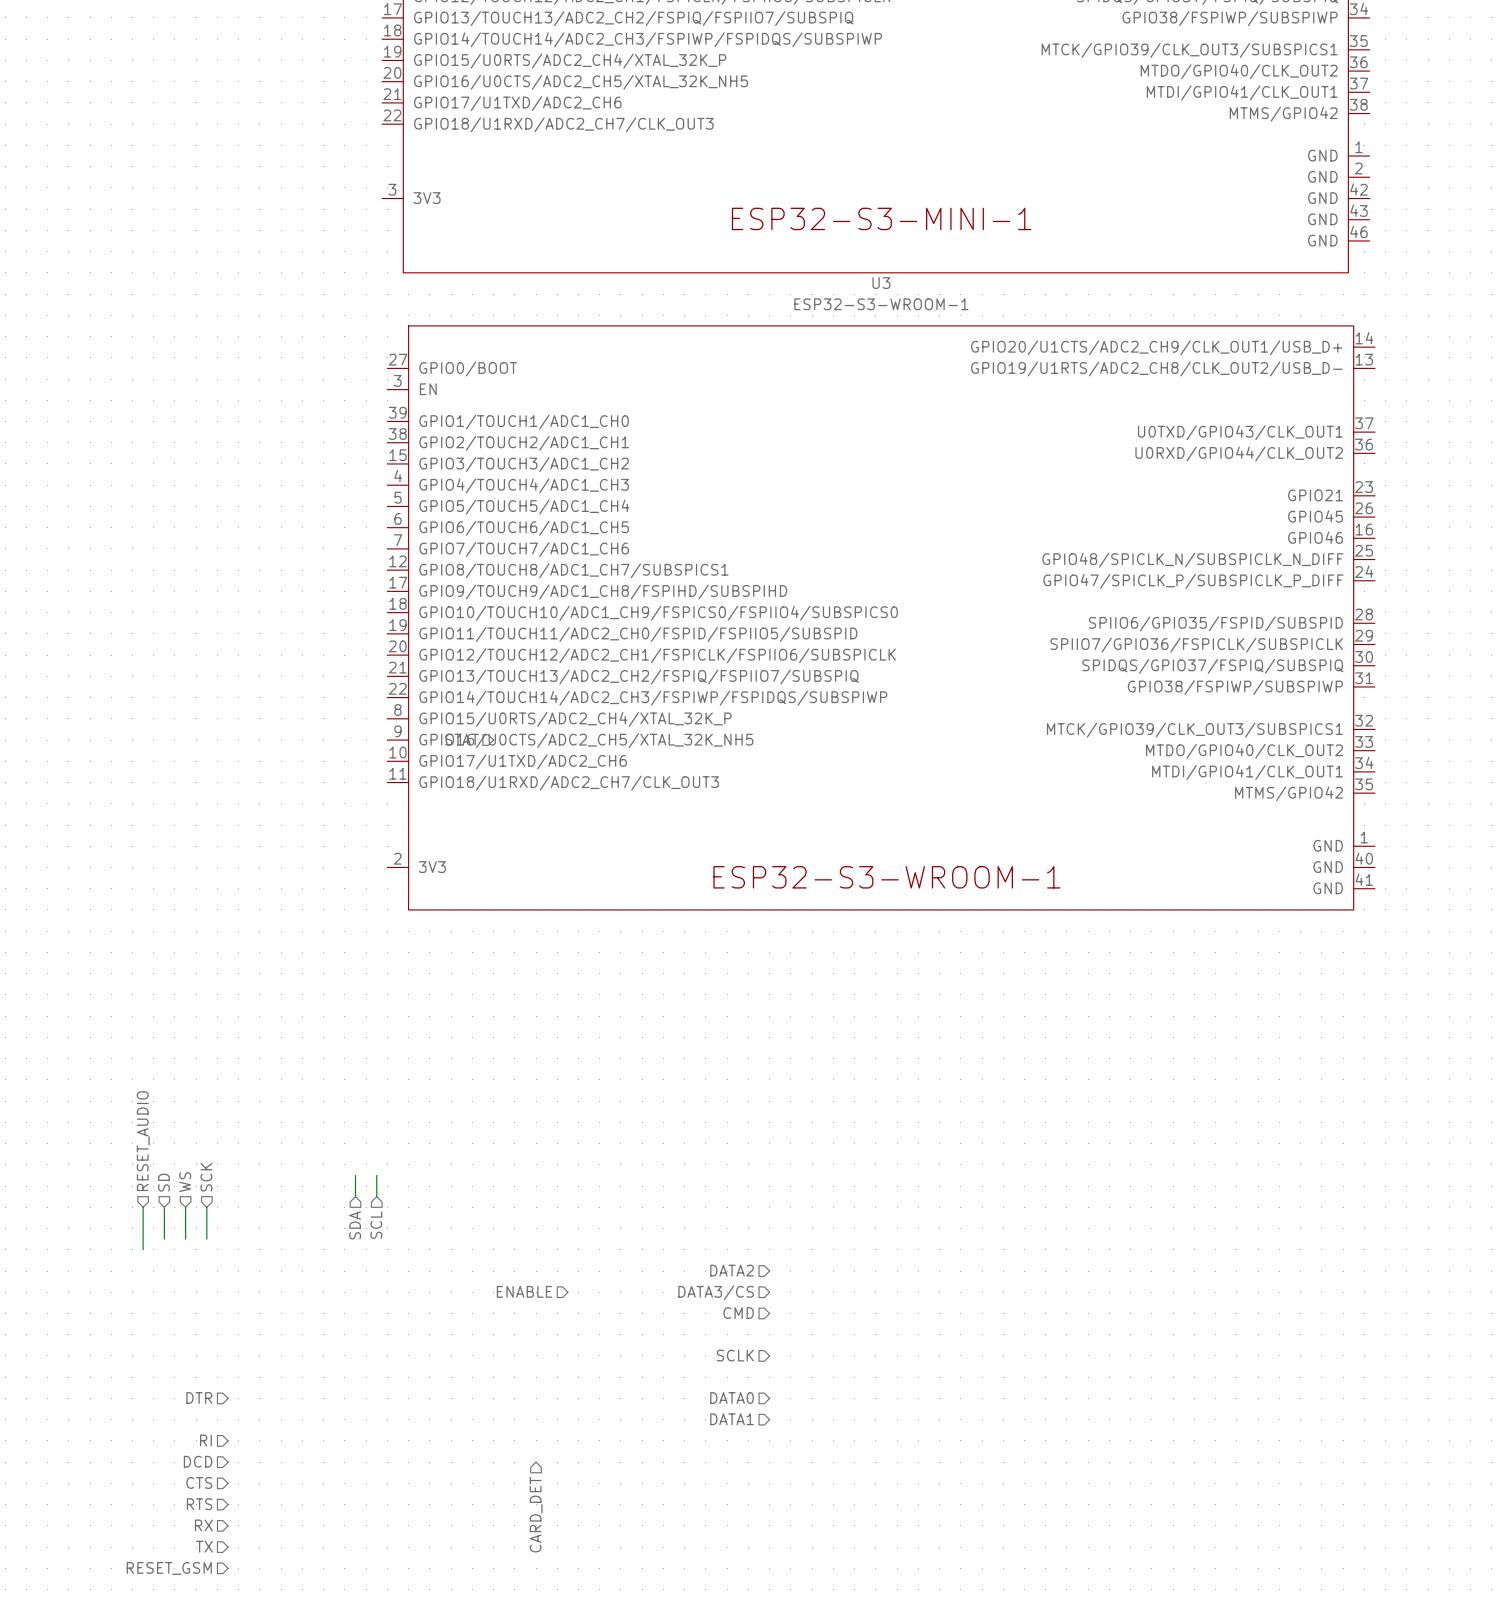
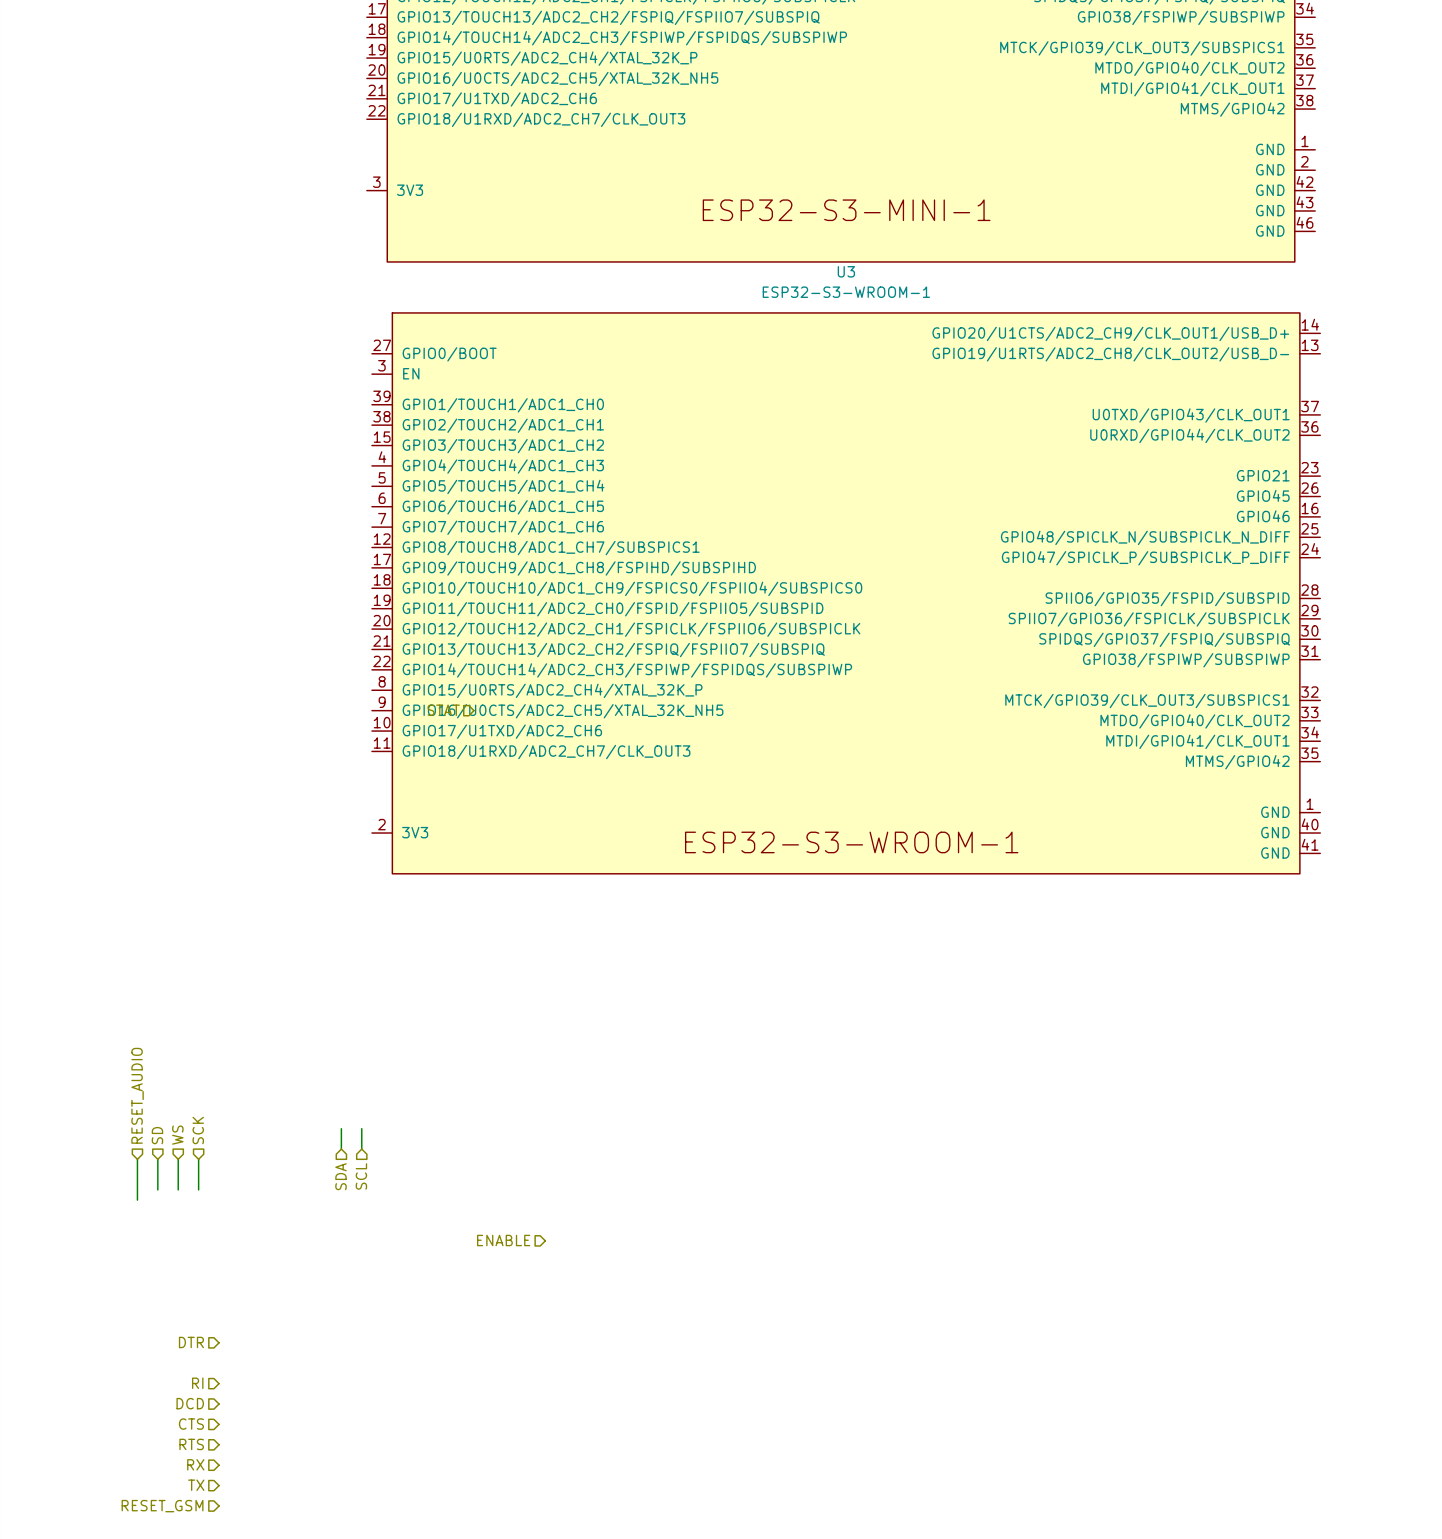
hierarchical label: DATA2 (732, 1270) -> none
hierarchical label: DATA3/CS (716, 1292) -> none
hierarchical label: CMD (738, 1313) -> none
hierarchical label: SCLK (735, 1355) -> none
hierarchical label: DATA0 (732, 1398) -> none
hierarchical label: DATA1 (732, 1419) -> none
hierarchical label: CARD_DET (536, 1514) -> none

